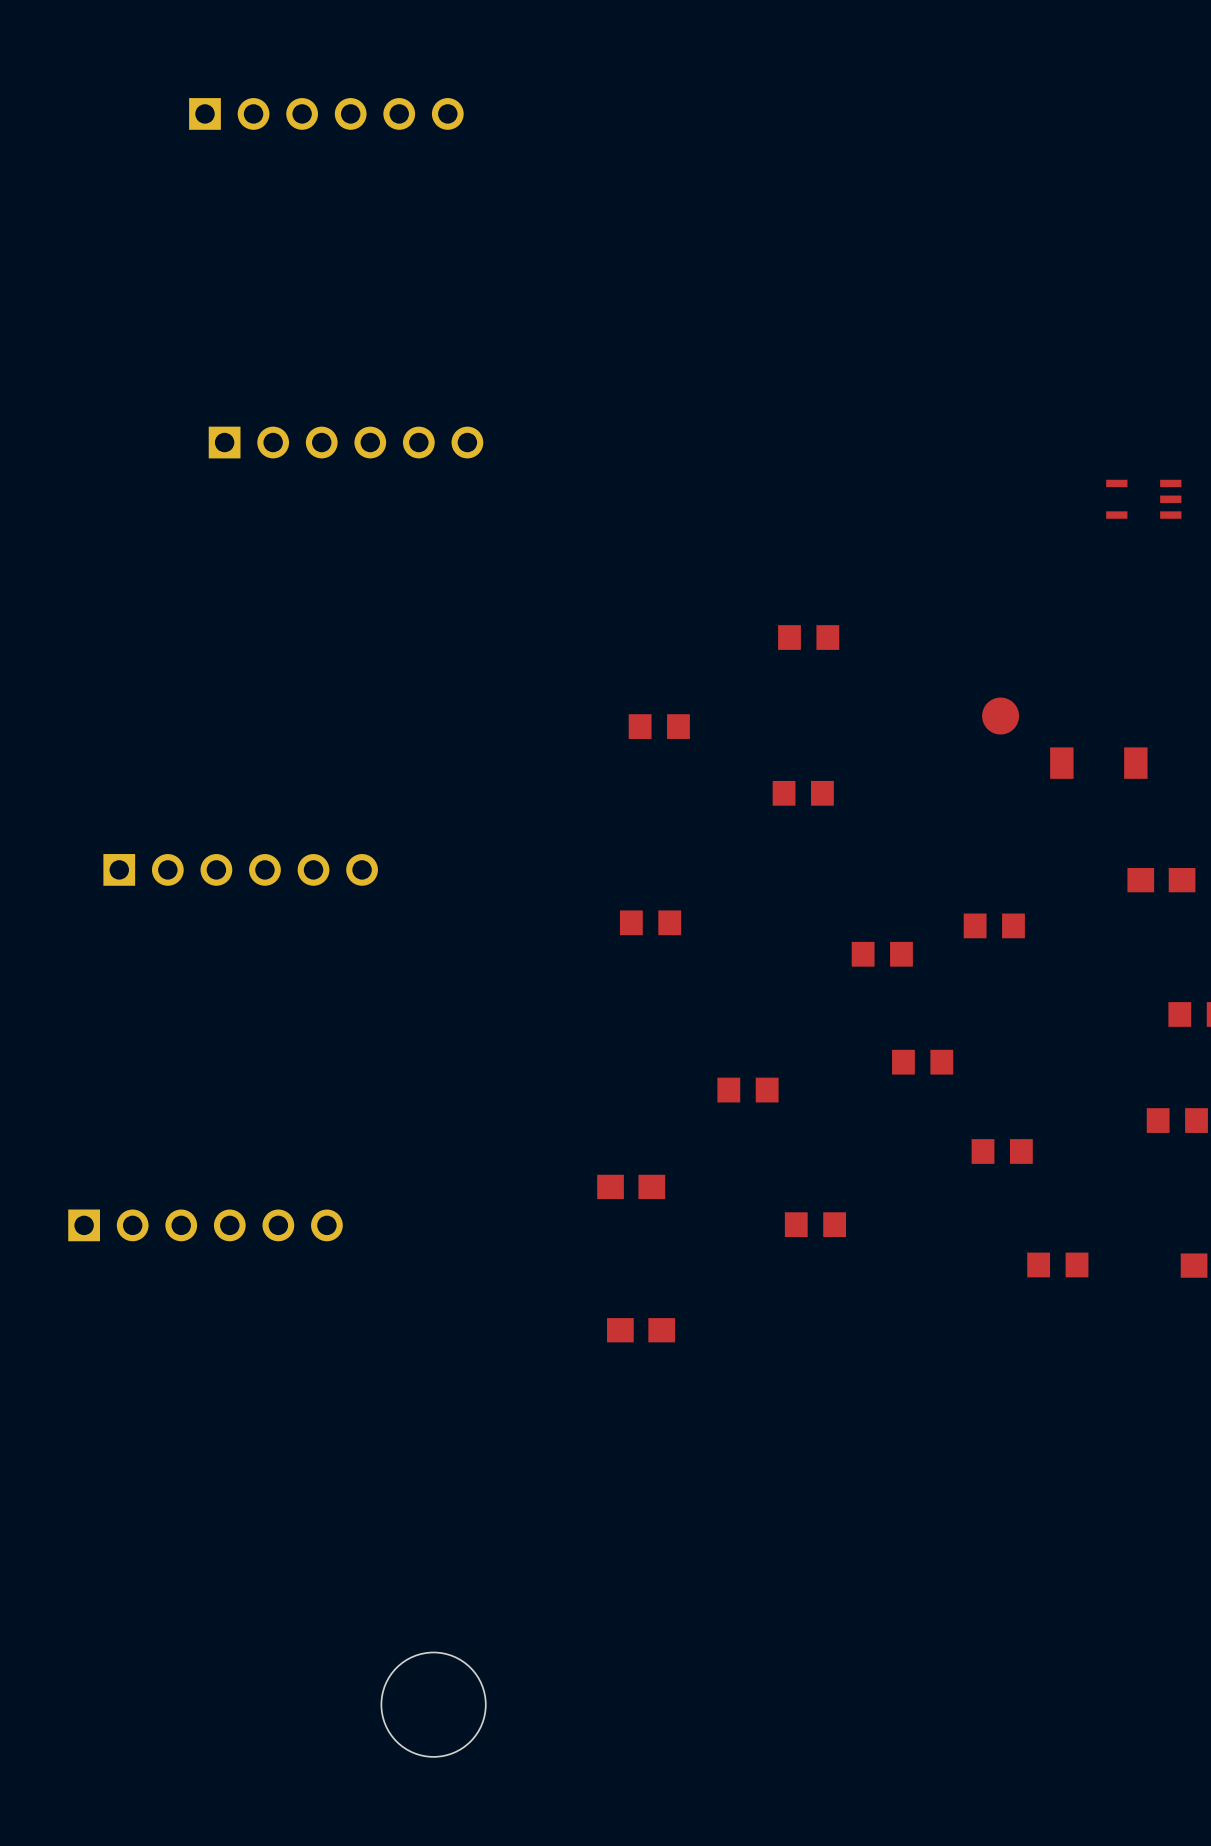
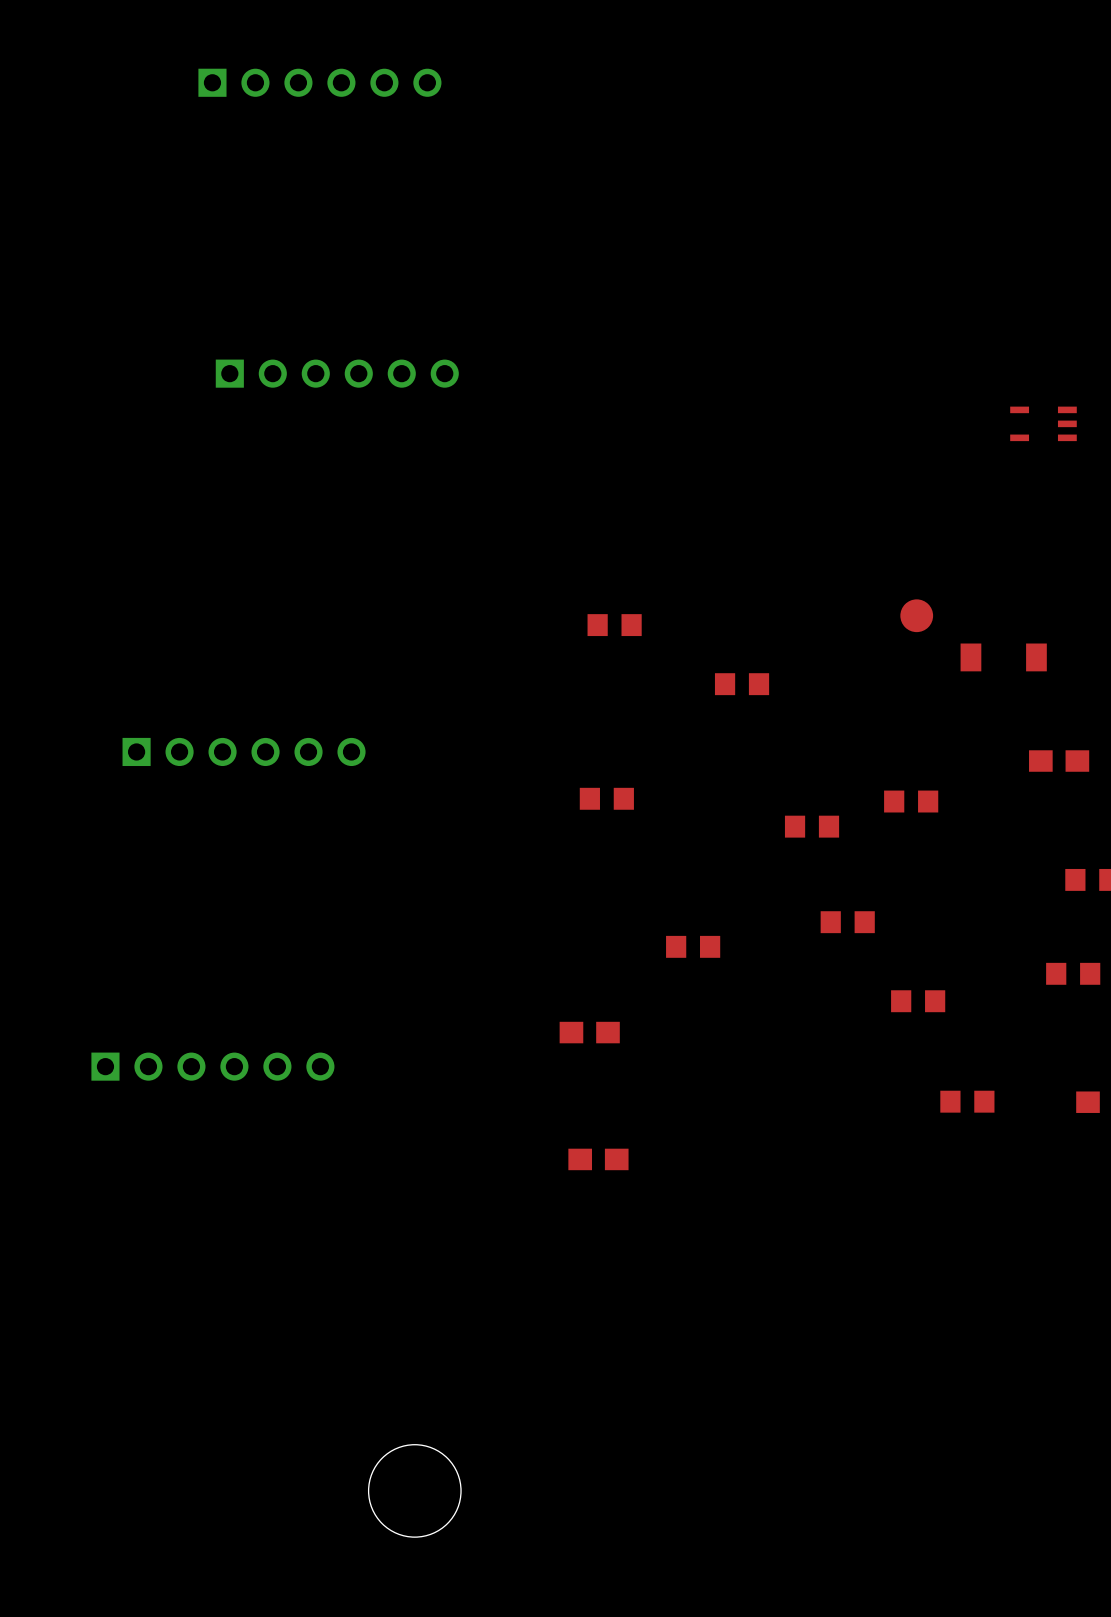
part: (808, 637) -> none
part: (815, 1224) -> none

